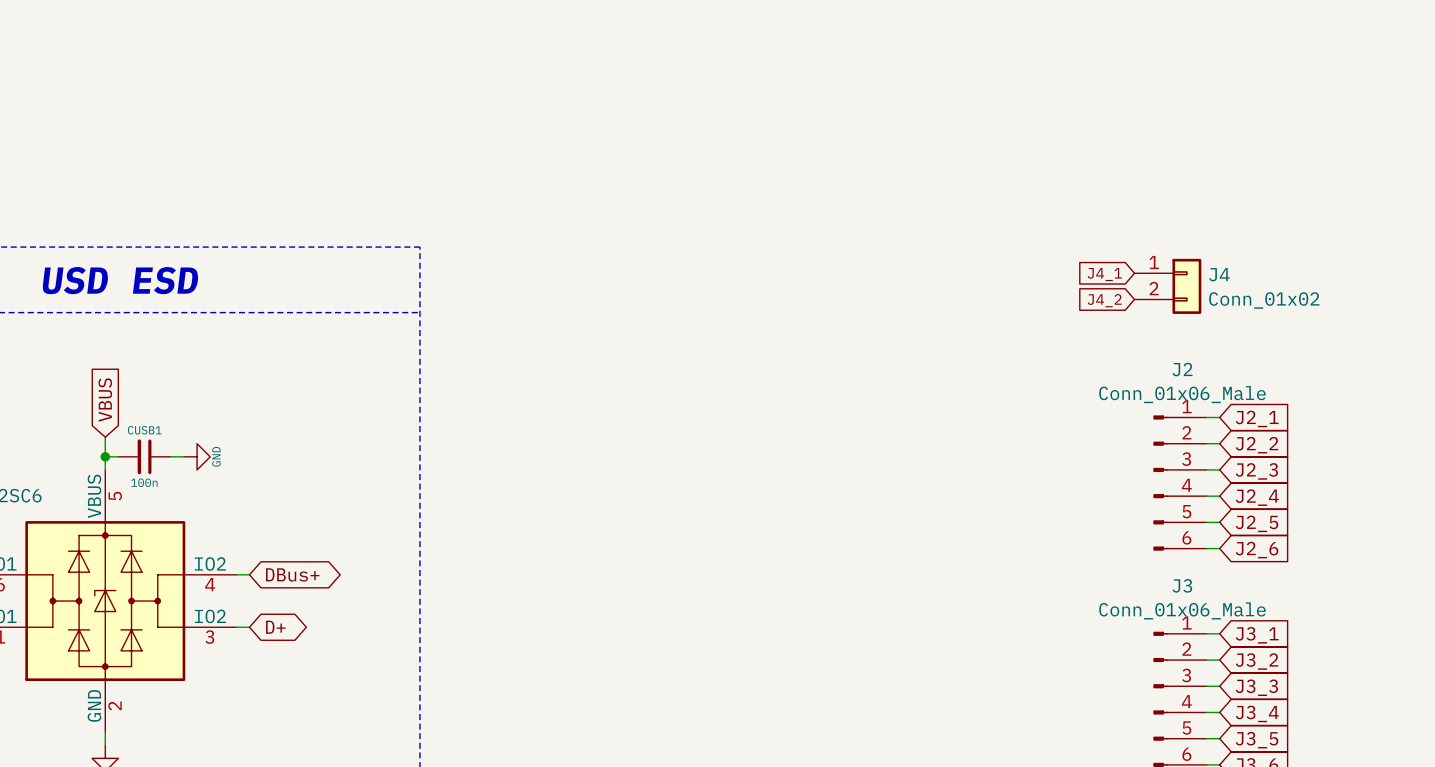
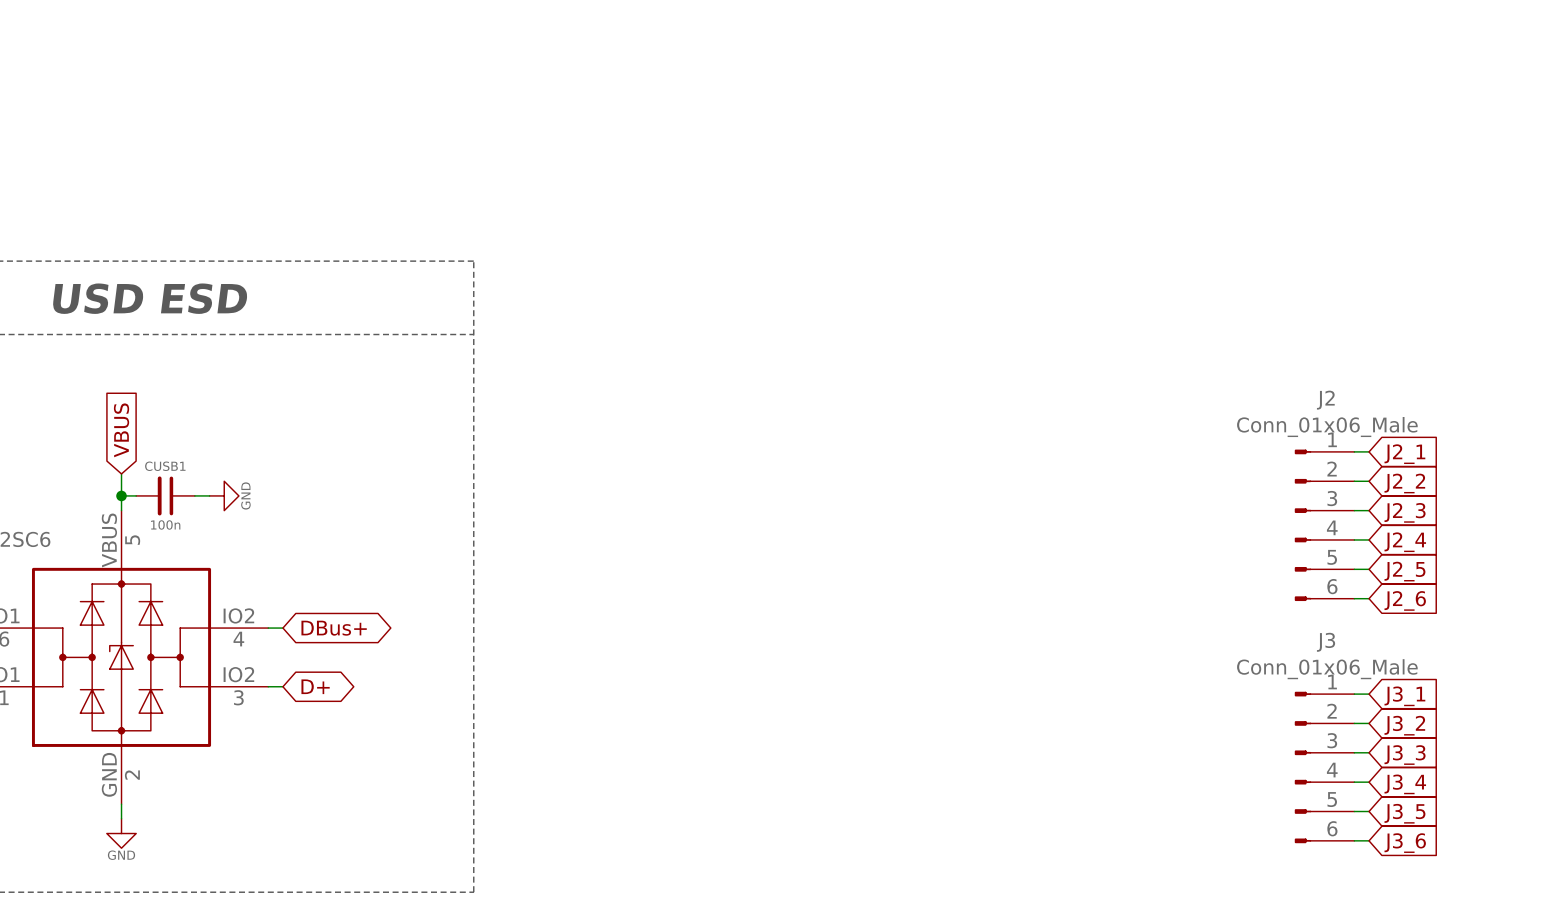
global label: J4_1 (1104, 274) -> none
J4: Conn_01x02 (1167, 286) -> none
global label: J4_2 (1104, 300) -> none

